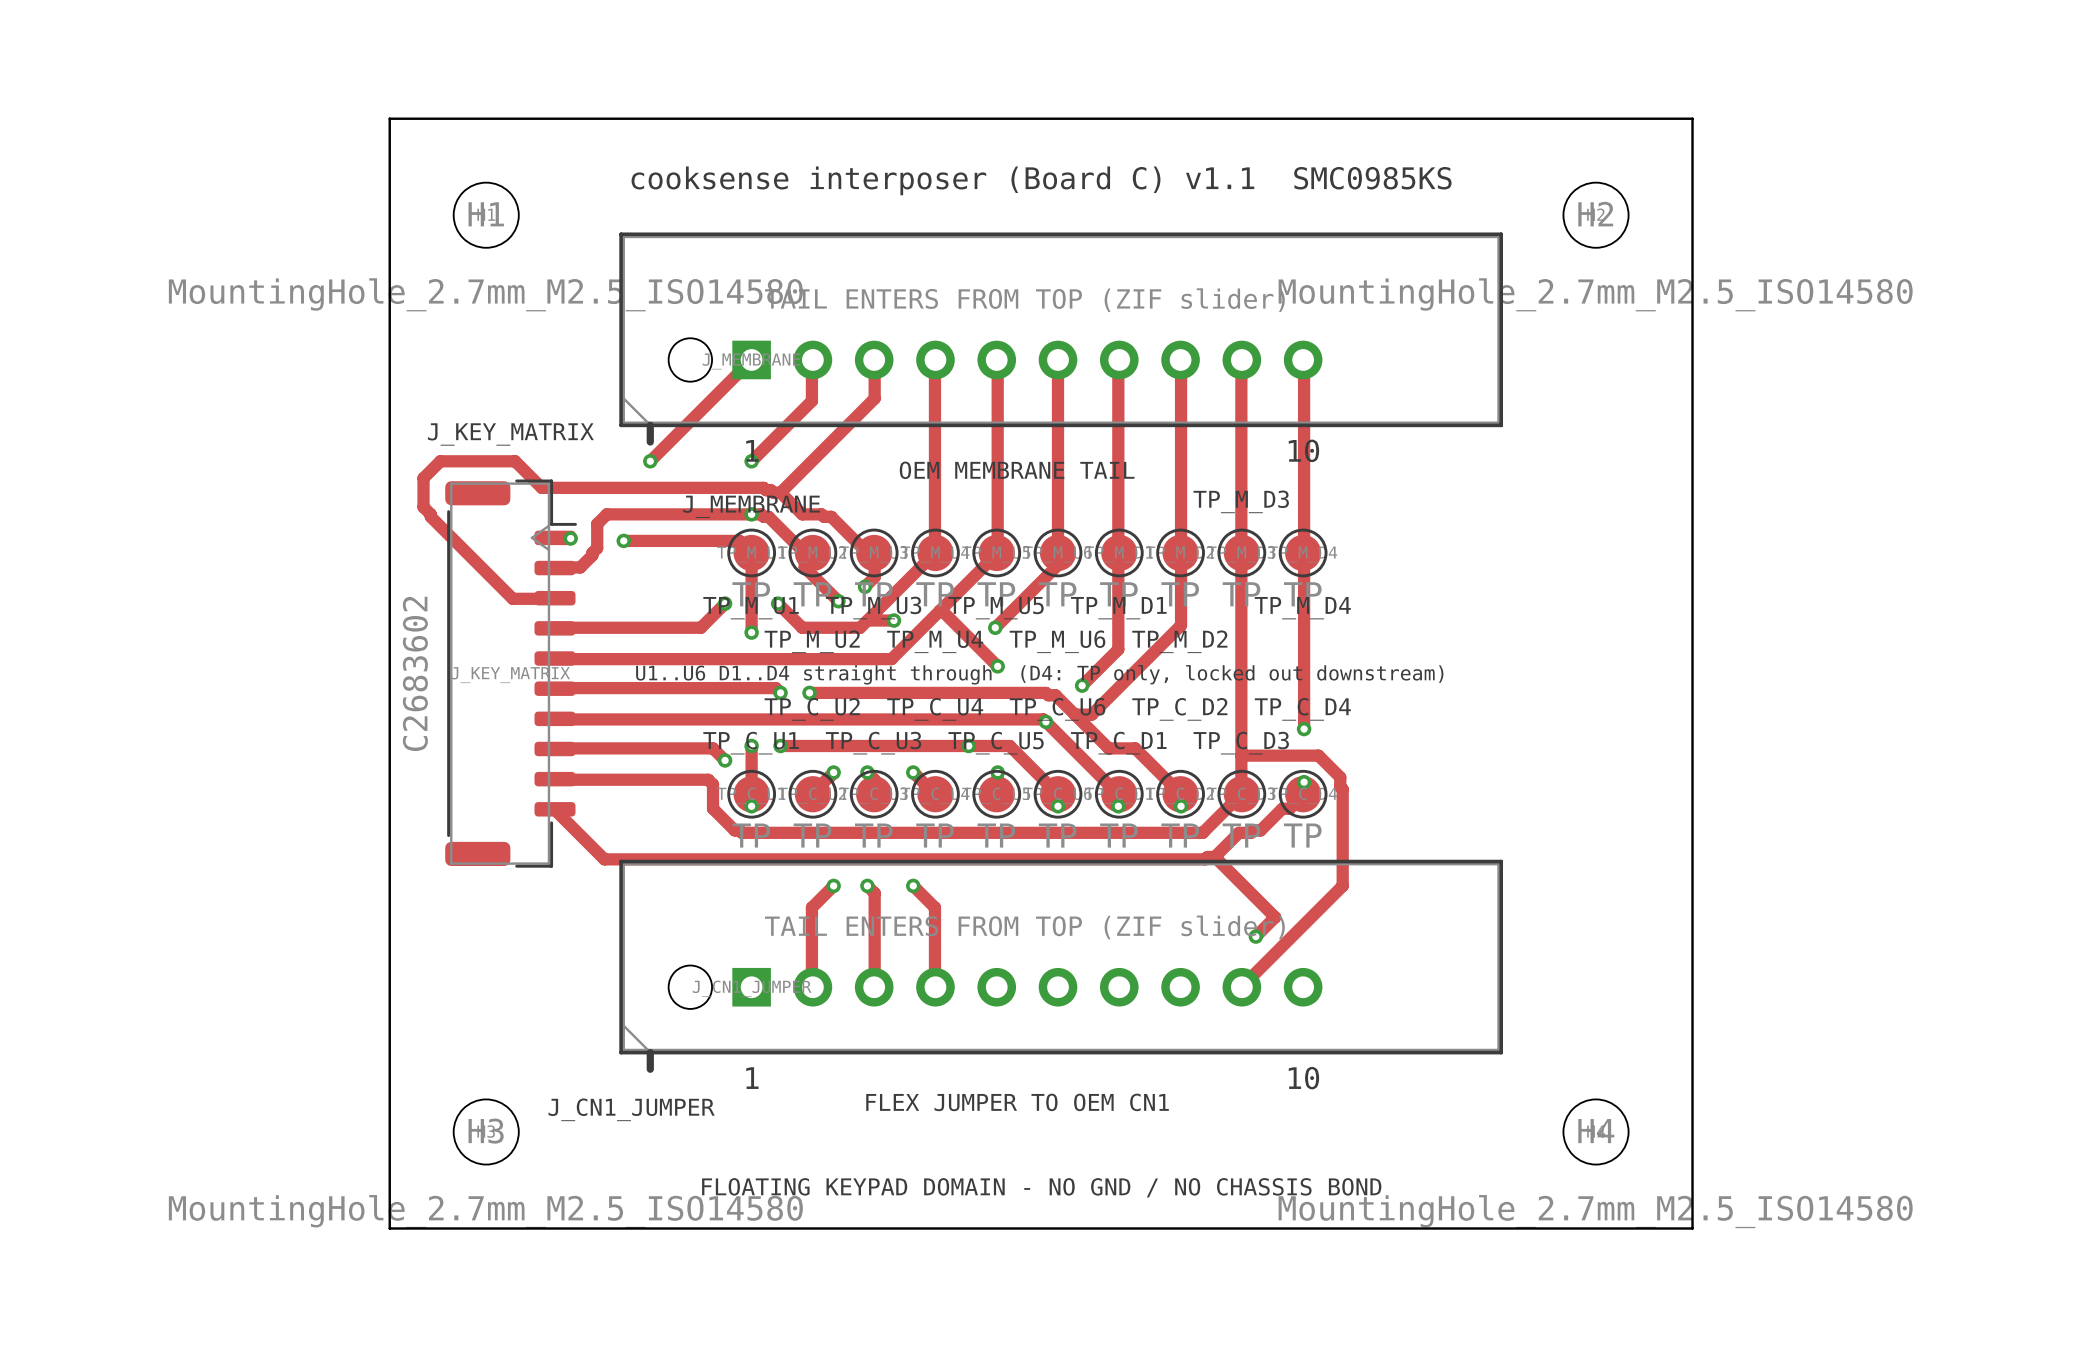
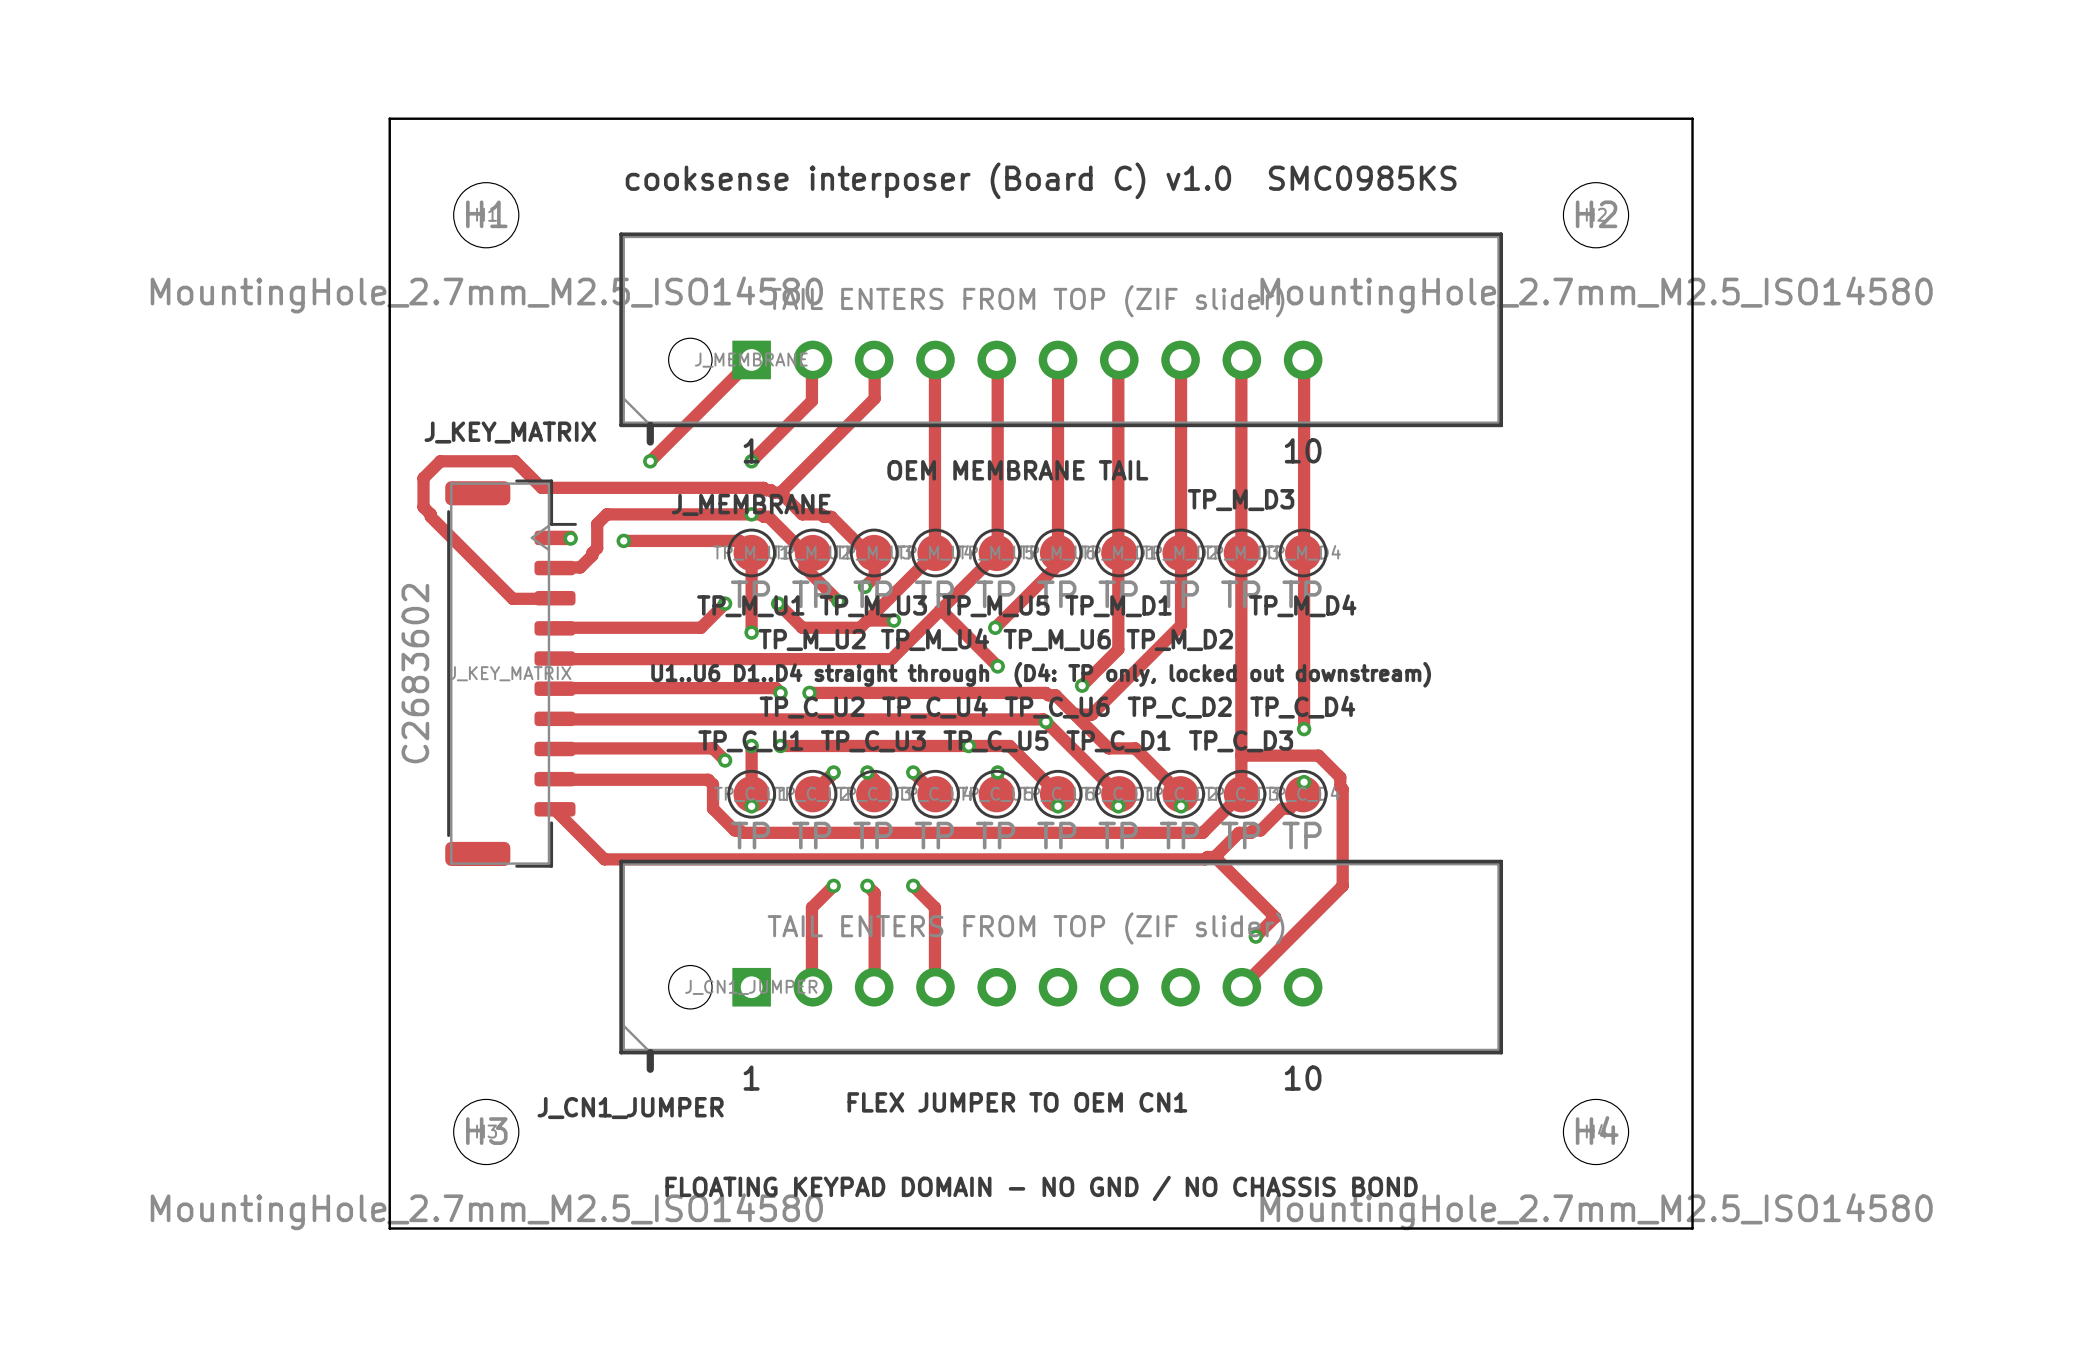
text: cooksense interposer (Board C) v1.1 SMC0985KS (1041, 180) -> cooksense interposer (Board C) v1.0 SMC0985KS (1041, 180)

